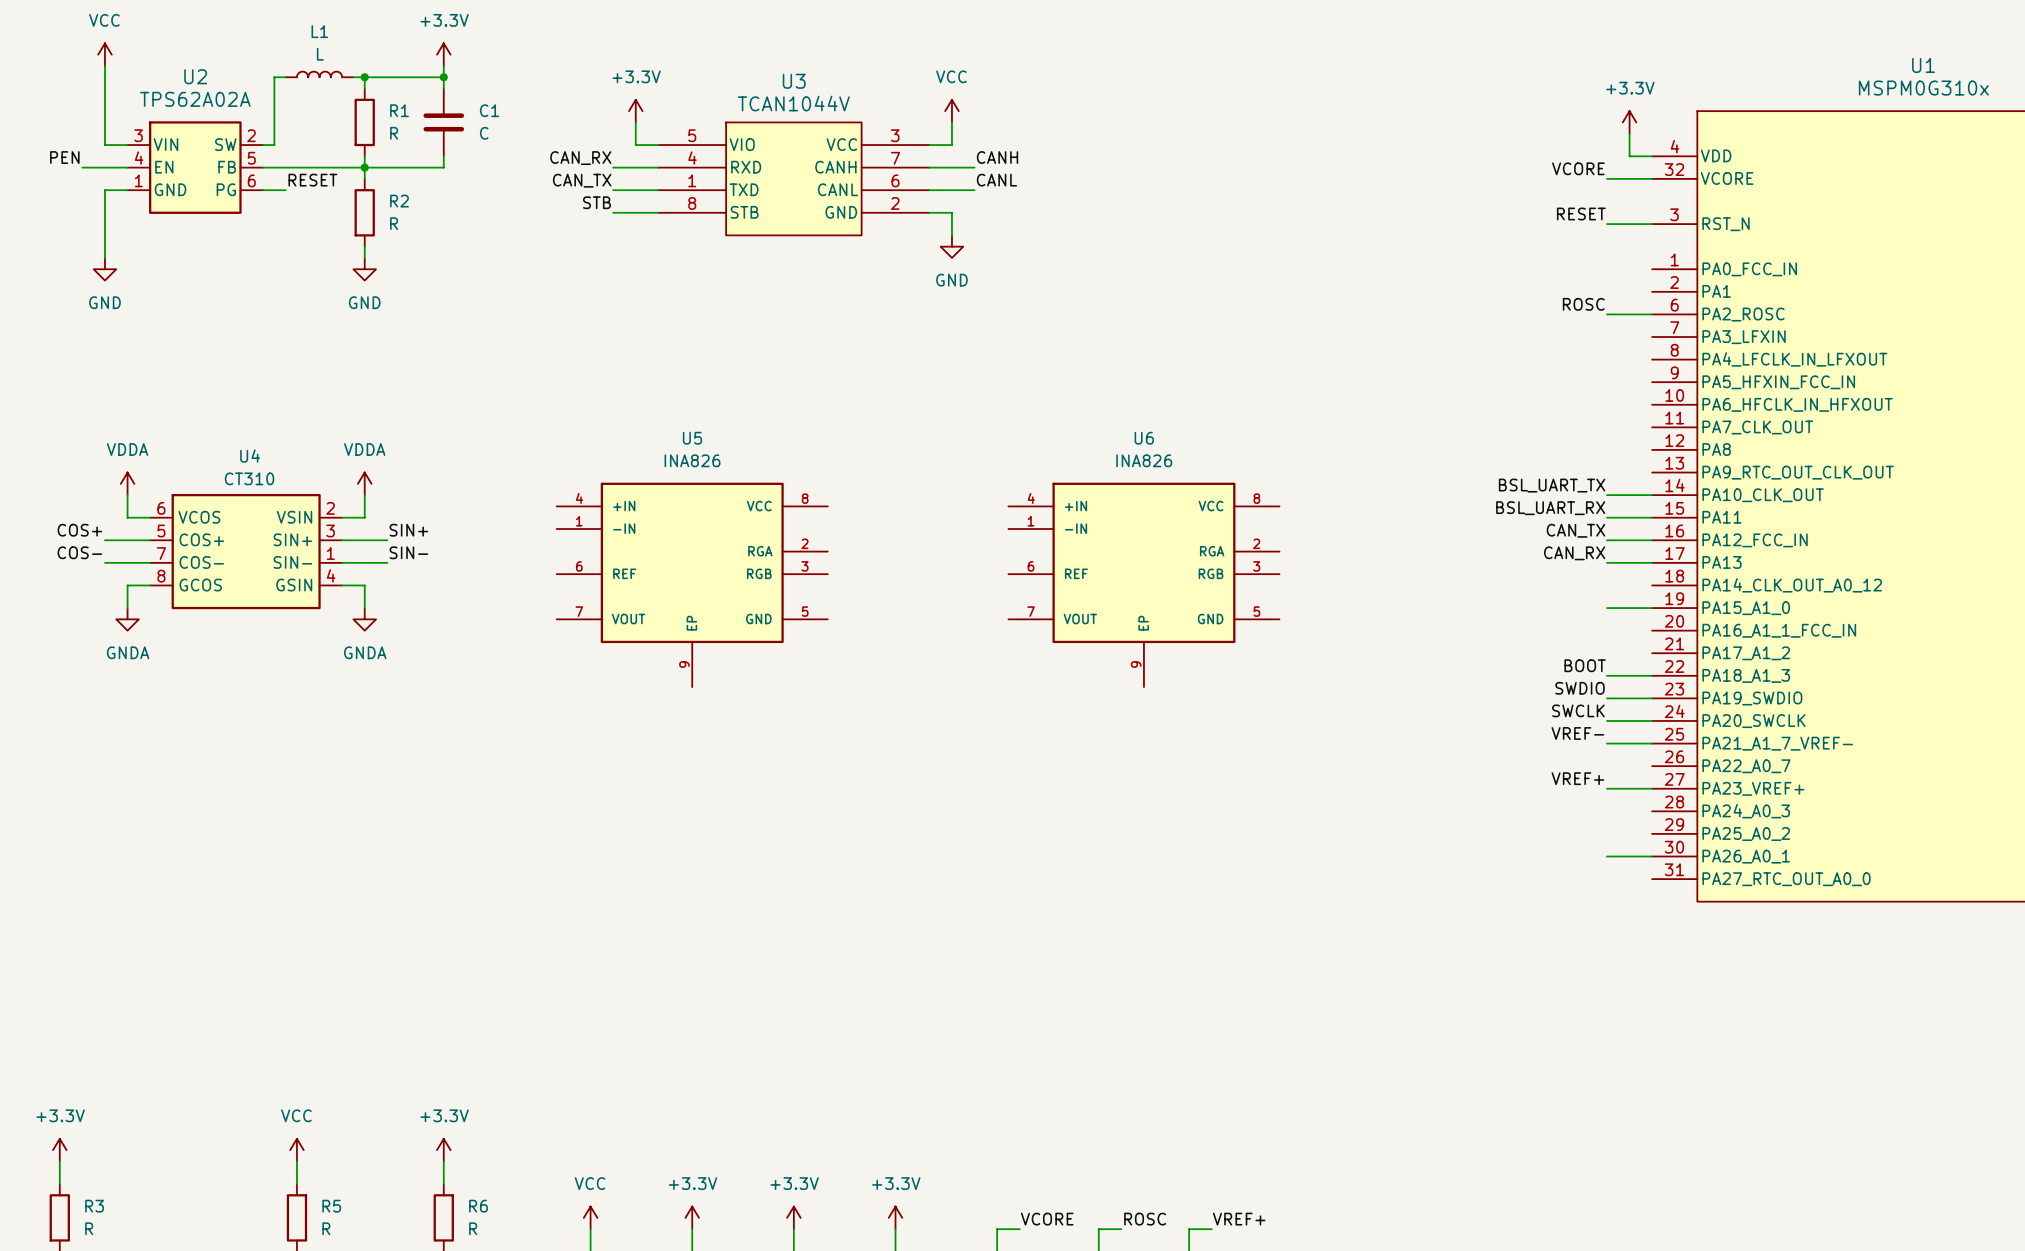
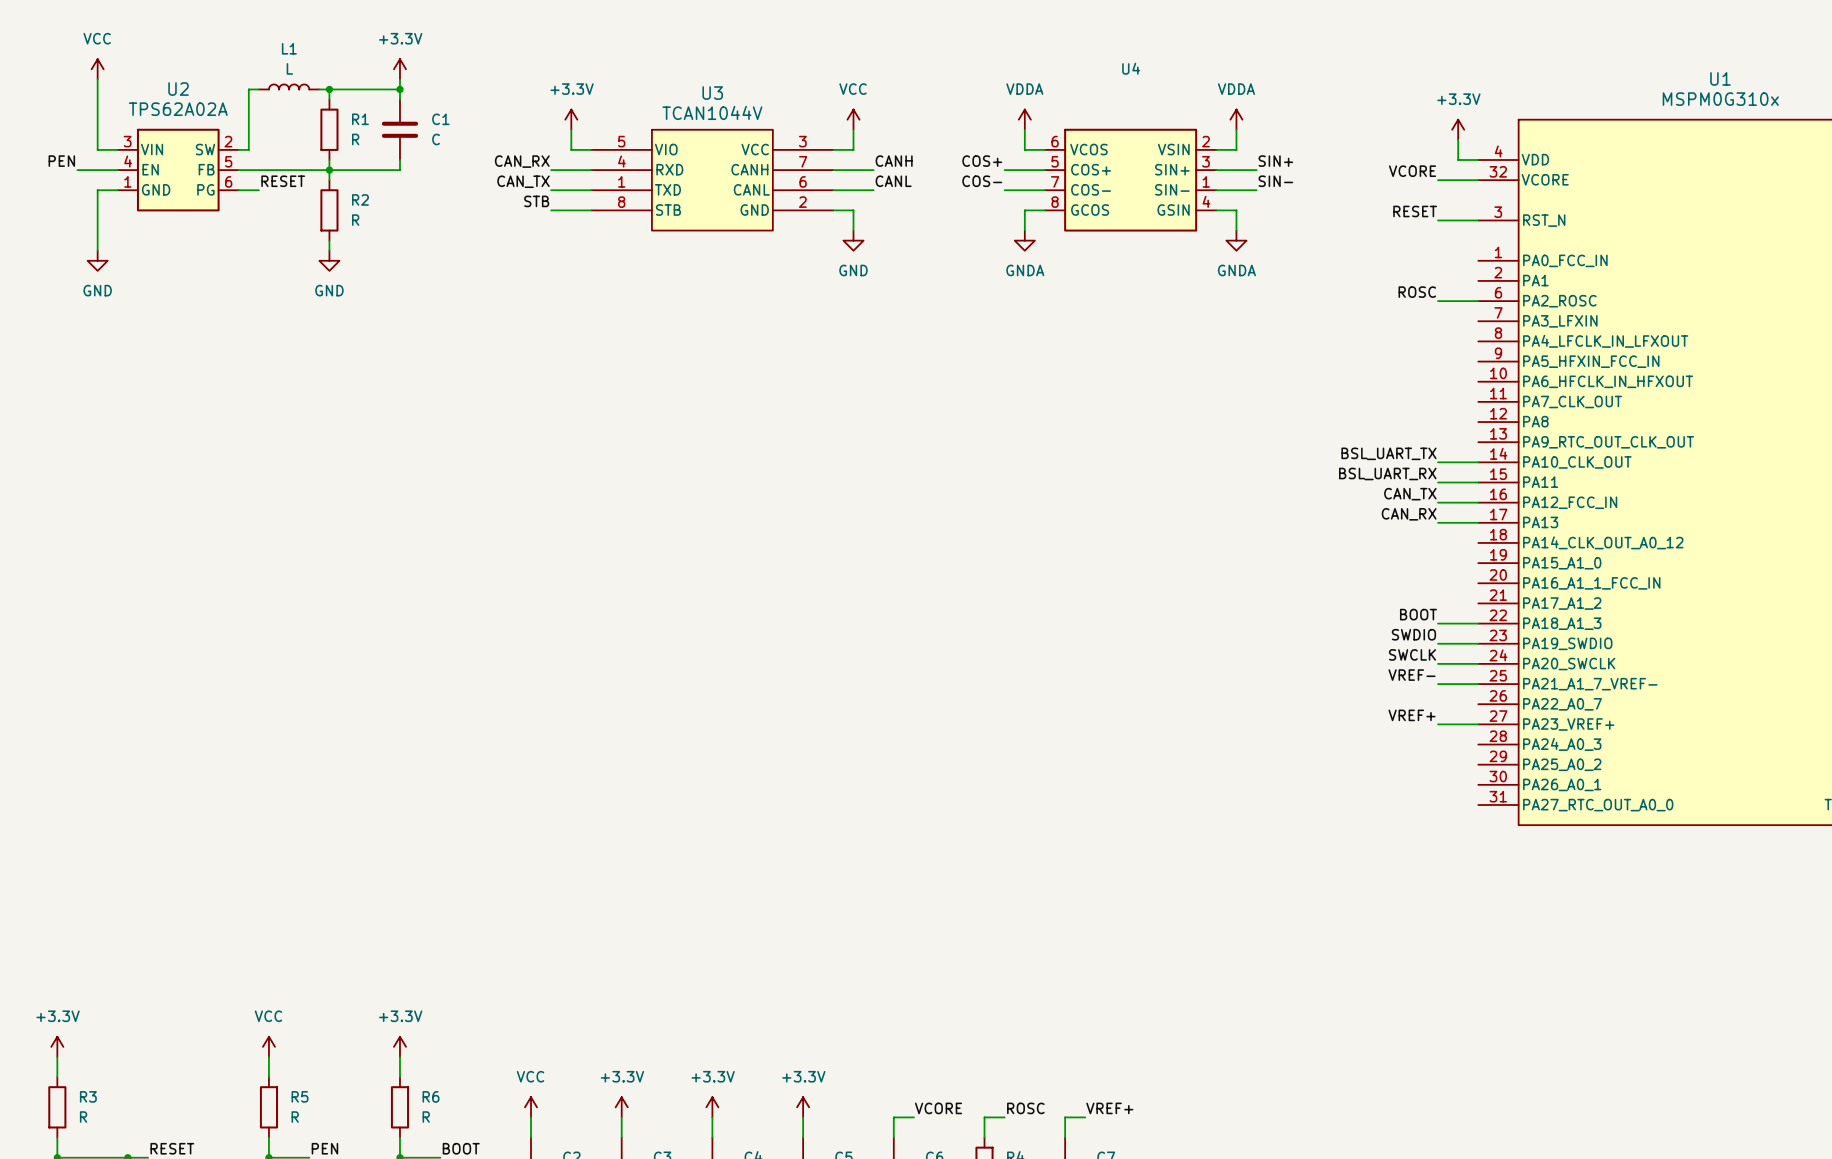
power symbol: none -> VDDA (1024, 119)
power symbol: none -> VDDA (1236, 119)
wire: none -> (1024, 129) (1024, 149) (1044, 149)
wire: none -> (1236, 129) (1236, 149) (1216, 149)
label: none -> COS+ (982, 161)
label: none -> SIN+ (1275, 161)
wire: none -> (1004, 170) (1044, 170)
wire: none -> (1216, 170) (1256, 170)
label: none -> COS- (982, 181)
label: none -> SIN- (1275, 181)
wire: none -> (1004, 190) (1044, 190)
wire: none -> (1216, 190) (1256, 190)
wire: none -> (1044, 210) (1024, 210) (1024, 230)
wire: none -> (1216, 210) (1236, 210) (1236, 230)
power symbol: none -> GNDA (1024, 240)
power symbol: none -> GNDA (1236, 240)
U4 name position: U4 (250, 456) -> U4 (1131, 68)
U4 value: CT310 (249, 478) -> none
power symbol: VDDA (127, 483) -> none
power symbol: VDDA (364, 483) -> none
wire: (127, 495) (127, 517) (150, 517) -> none
wire: (364, 495) (364, 517) (342, 517) -> none
label: COS+ (79, 530) -> none
label: SIN+ (408, 530) -> none
wire: (104, 540) (150, 540) -> none
wire: (342, 540) (387, 540) -> none
U4 position: (246, 551) -> (1130, 180)
label: COS- (79, 552) -> none
label: SIN- (408, 552) -> none
wire: (104, 562) (150, 562) -> none
wire: (342, 562) (387, 562) -> none
U5: INA826 (692, 584) -> none
U6: INA826 (1143, 584) -> none
wire: (150, 585) (127, 585) (127, 608) -> none
wire: (342, 585) (364, 585) (364, 608) -> none
wire: (1606, 608) (1652, 608) -> none
power symbol: GNDA (127, 619) -> none
power symbol: GNDA (364, 619) -> none
wire: (1606, 856) (1652, 856) -> none

